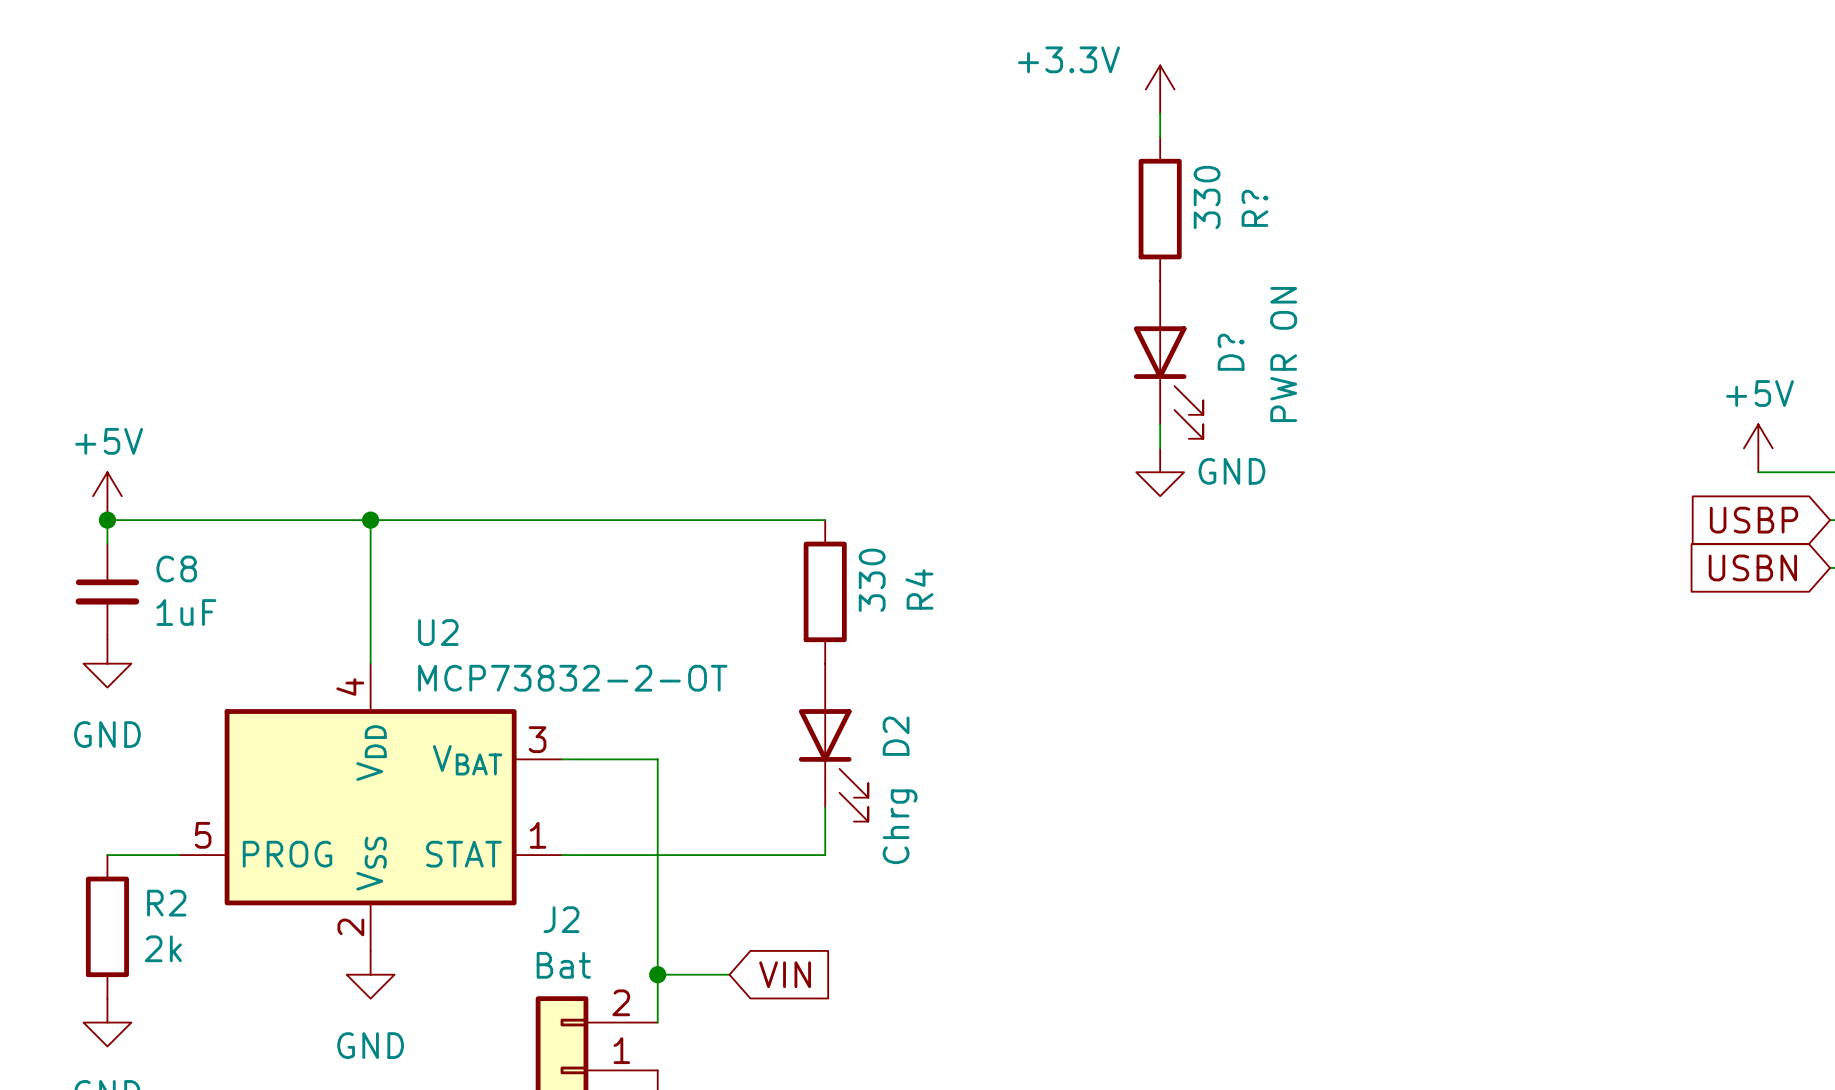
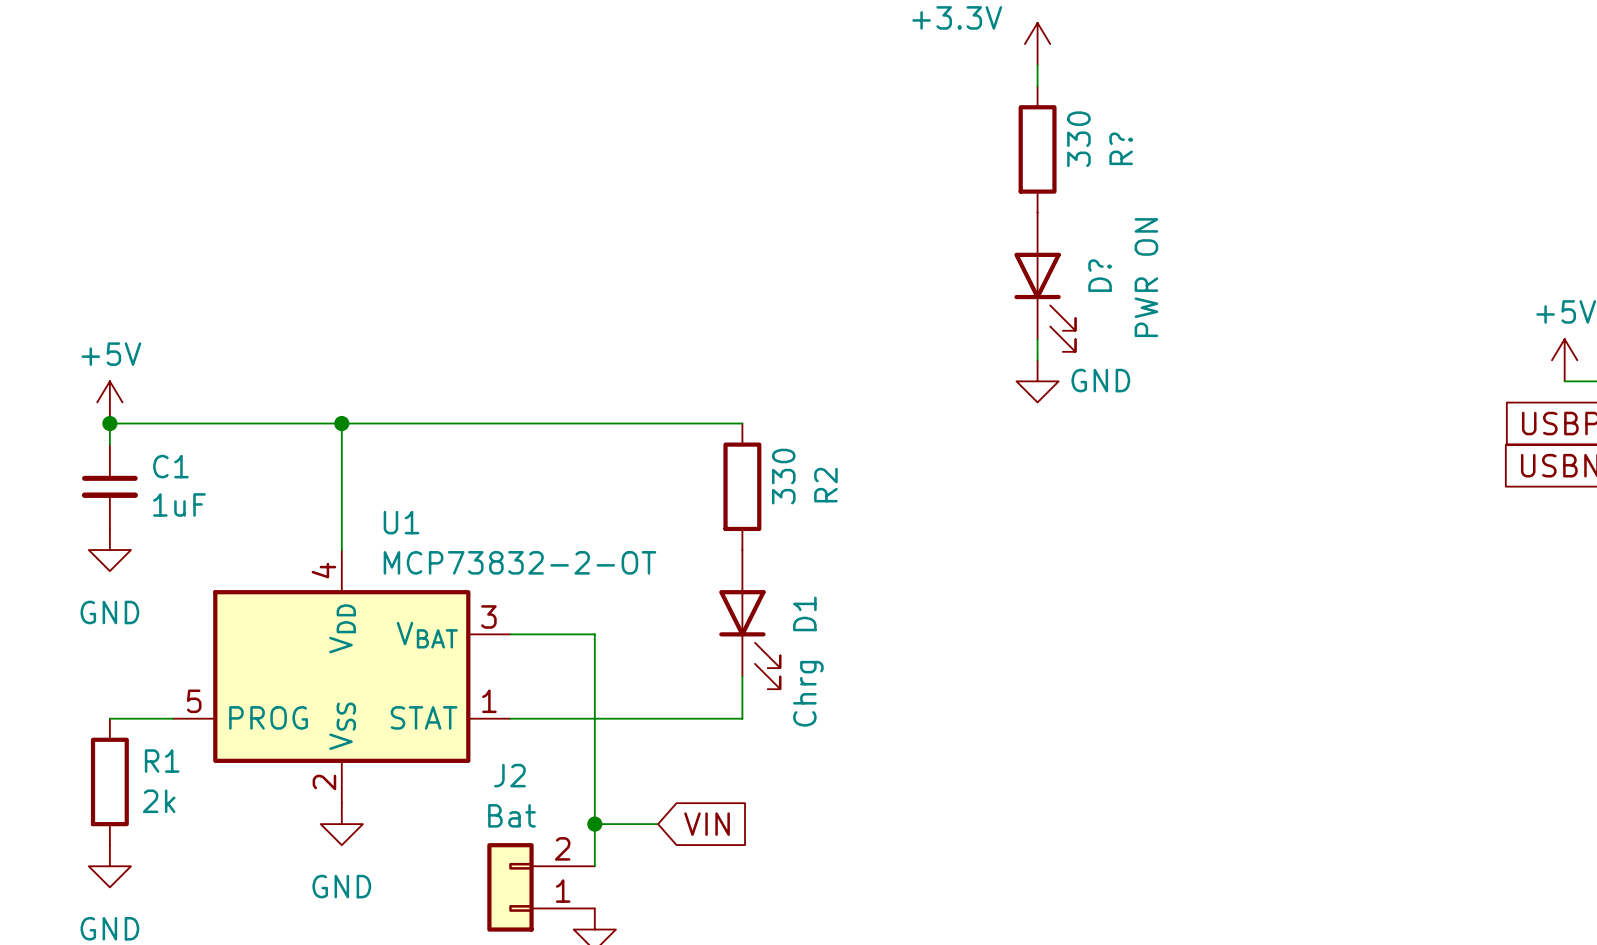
C8 name: C8 (176, 568) -> C1 (170, 466)
R4 name: R4 (919, 589) -> R2 (825, 485)
U2 name: U2 (438, 632) -> U1 (401, 522)
D2 name: D2 (896, 736) -> D1 (804, 613)
R2 name: R2 (166, 903) -> R1 (162, 761)

